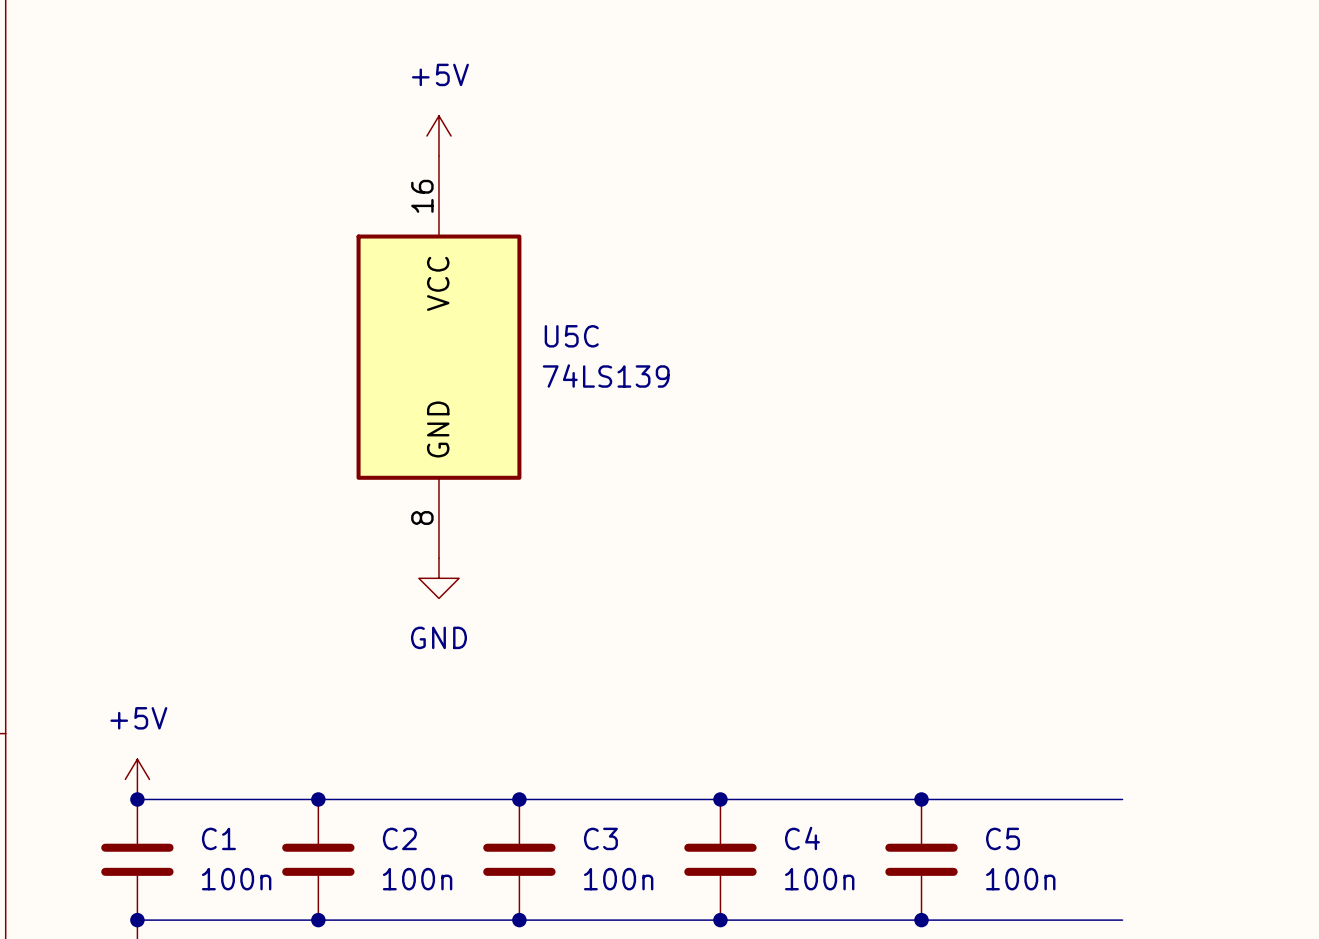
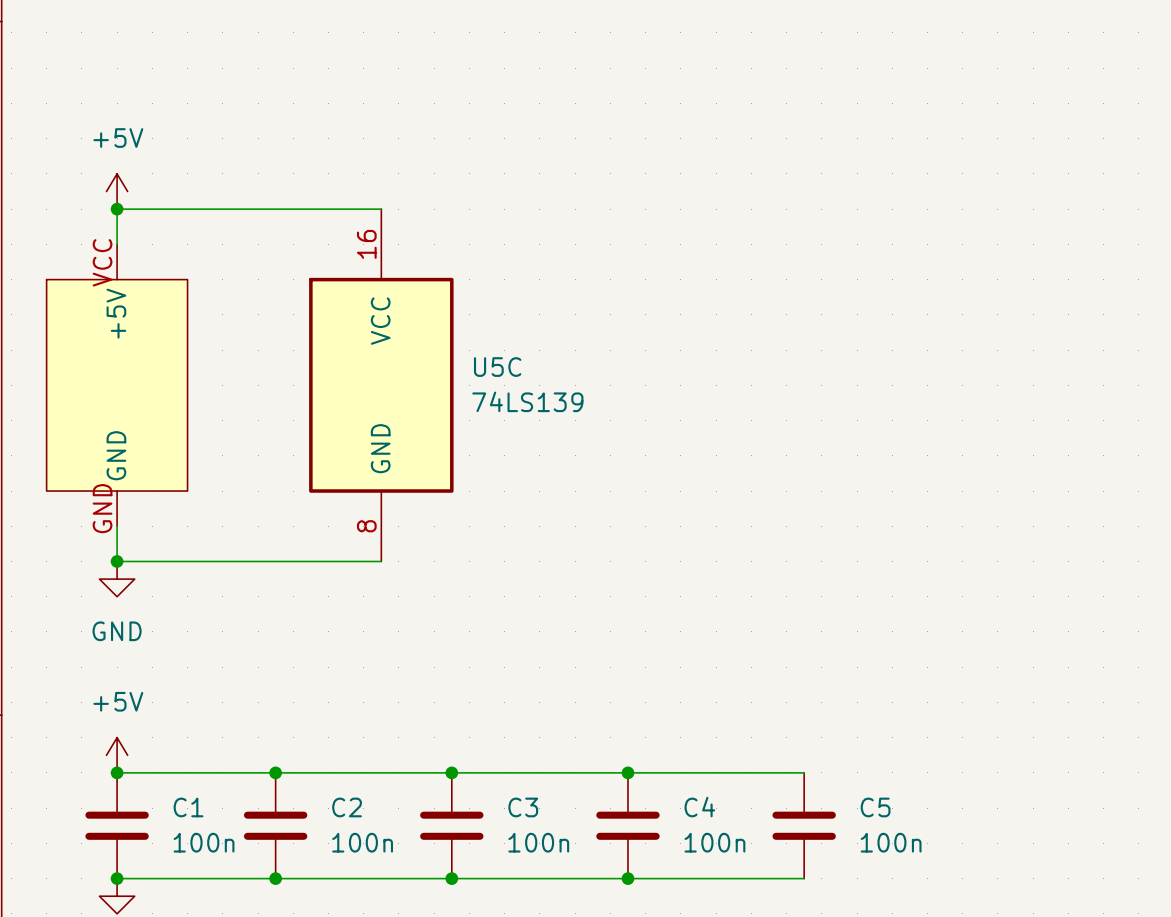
power symbol position: +5V (438, 136) -> +5V (117, 191)
junction: none -> (117, 209)
wire: none -> (381, 209) (117, 209) (117, 244)
part: none -> (117, 385)
wire: none -> (117, 526) (117, 561) (381, 561)
junction: none -> (117, 561)
power symbol position: GND (438, 578) -> GND (117, 579)
wire: (921, 799) (1122, 799) -> none
junction: (921, 799) -> none
wire: (921, 920) (1122, 920) -> none
junction: (921, 920) -> none

